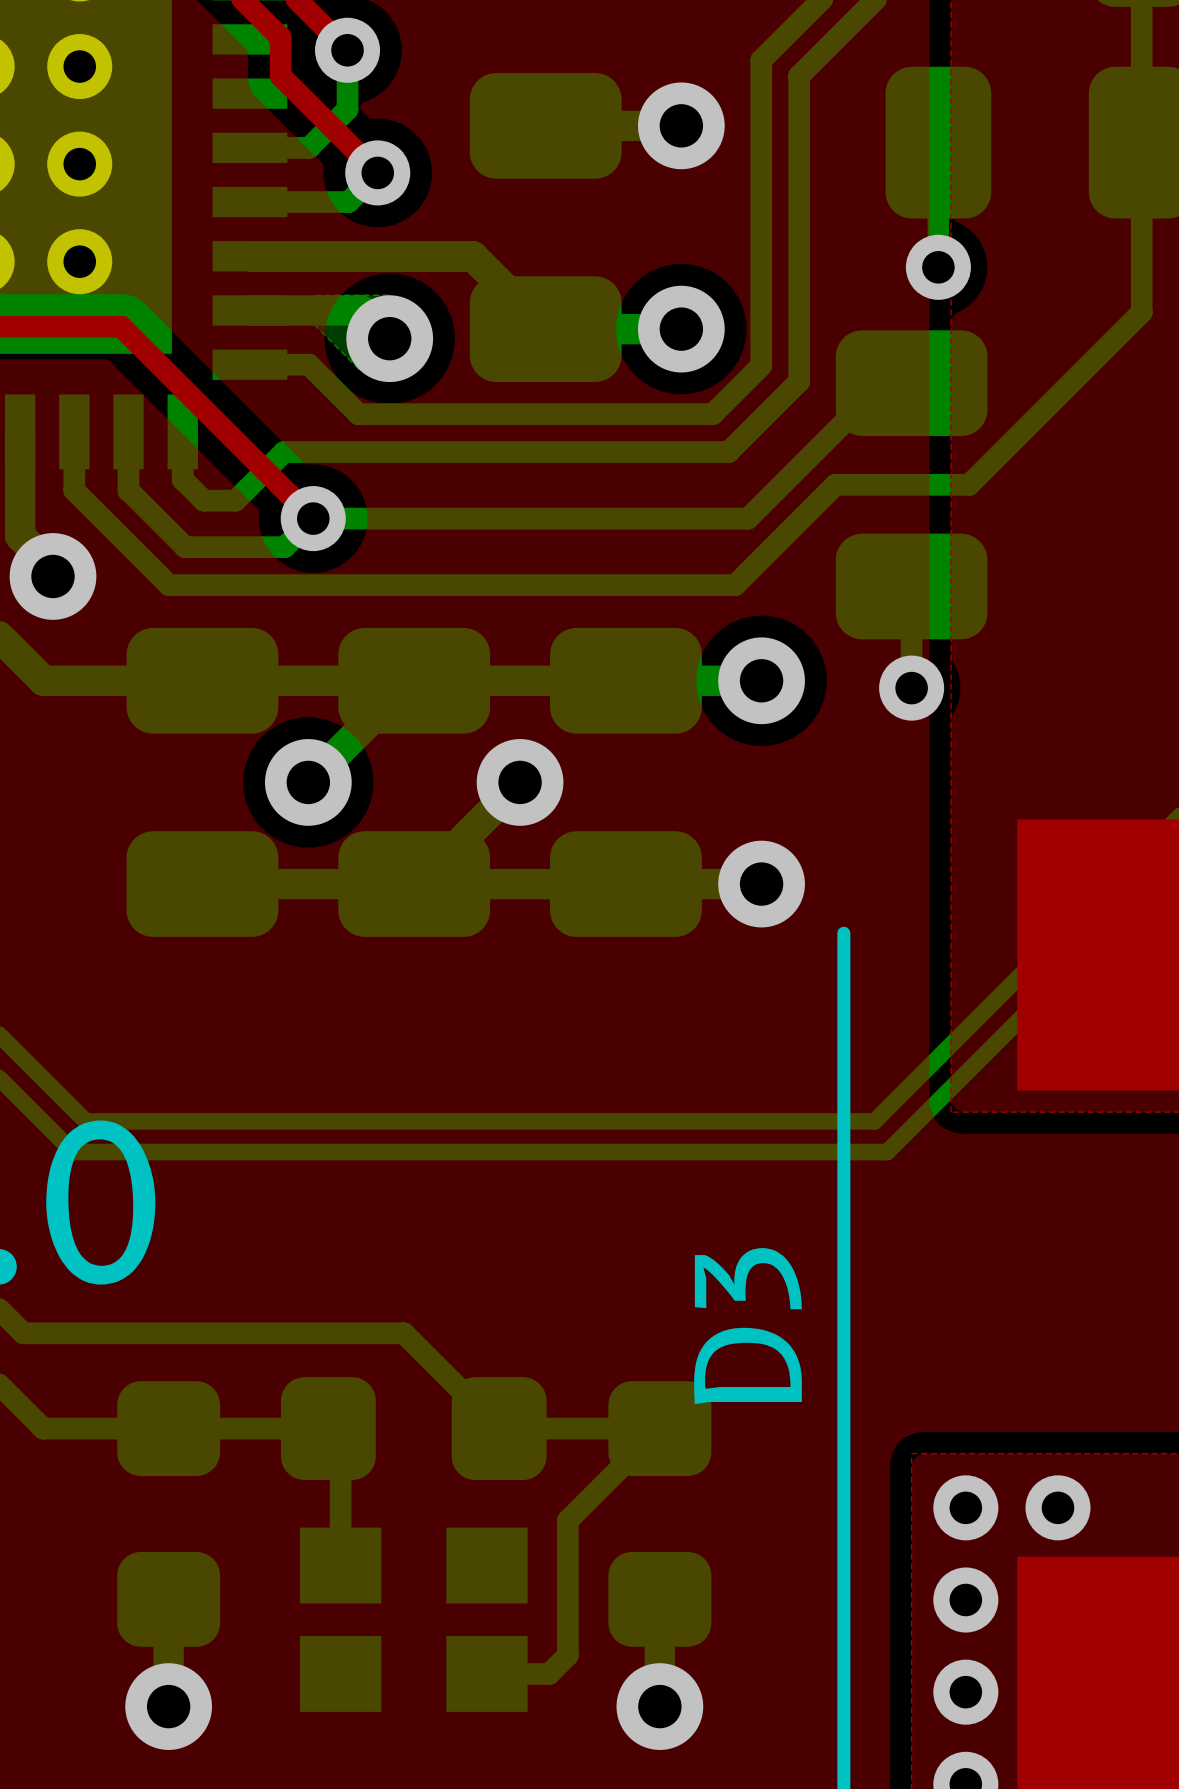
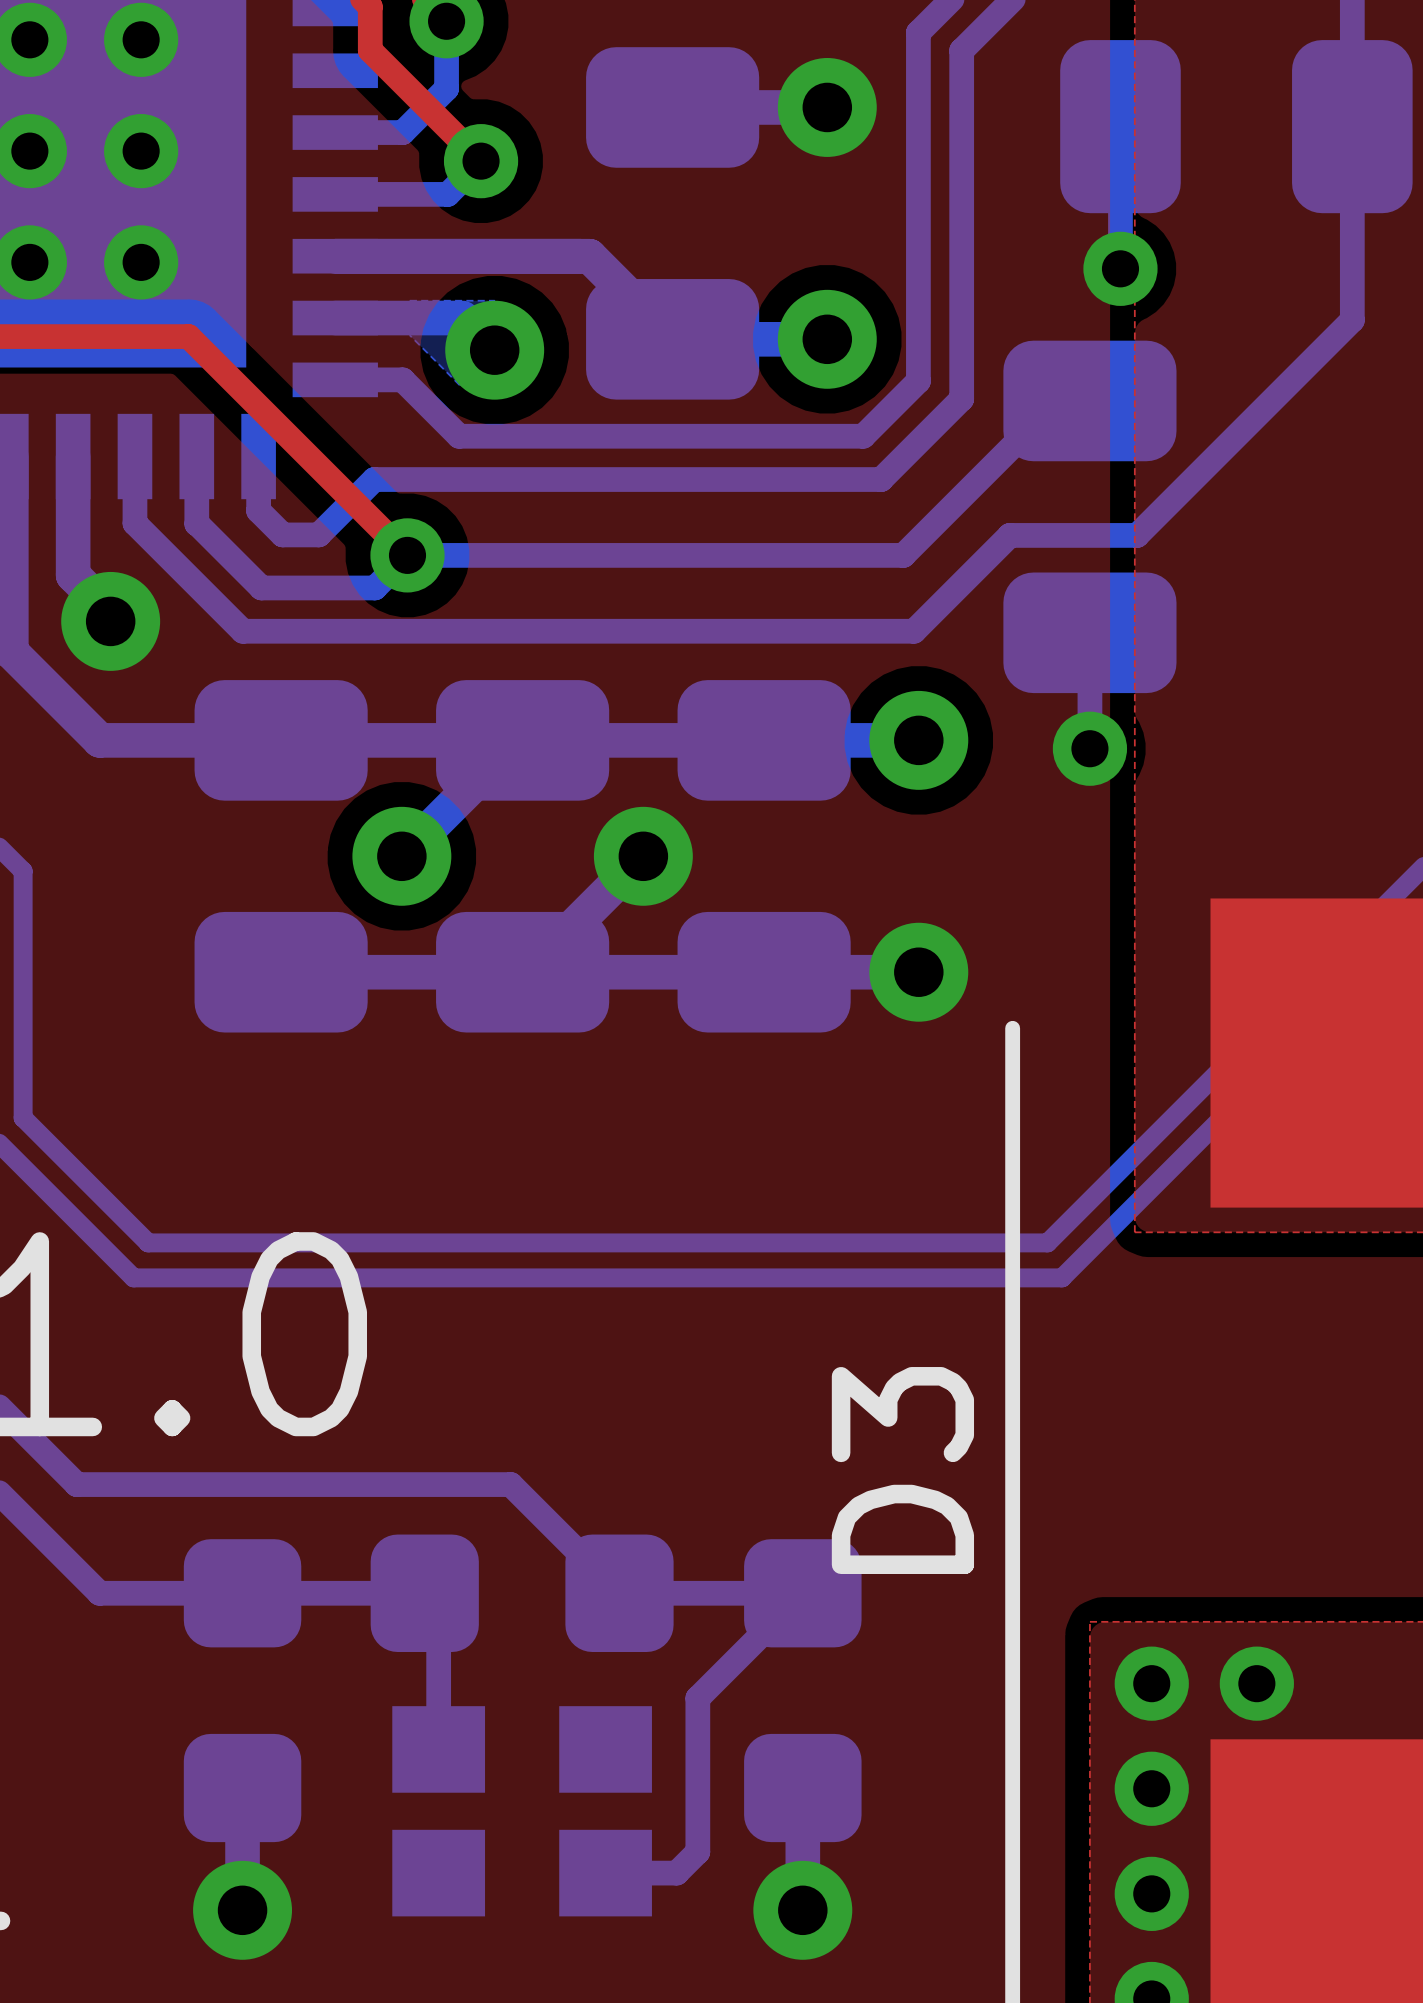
bottom track: (969, 484) (835, 484) (735, 585) -> (1155, 516) (1137, 535) (1009, 535) (914, 631) (888, 631)

